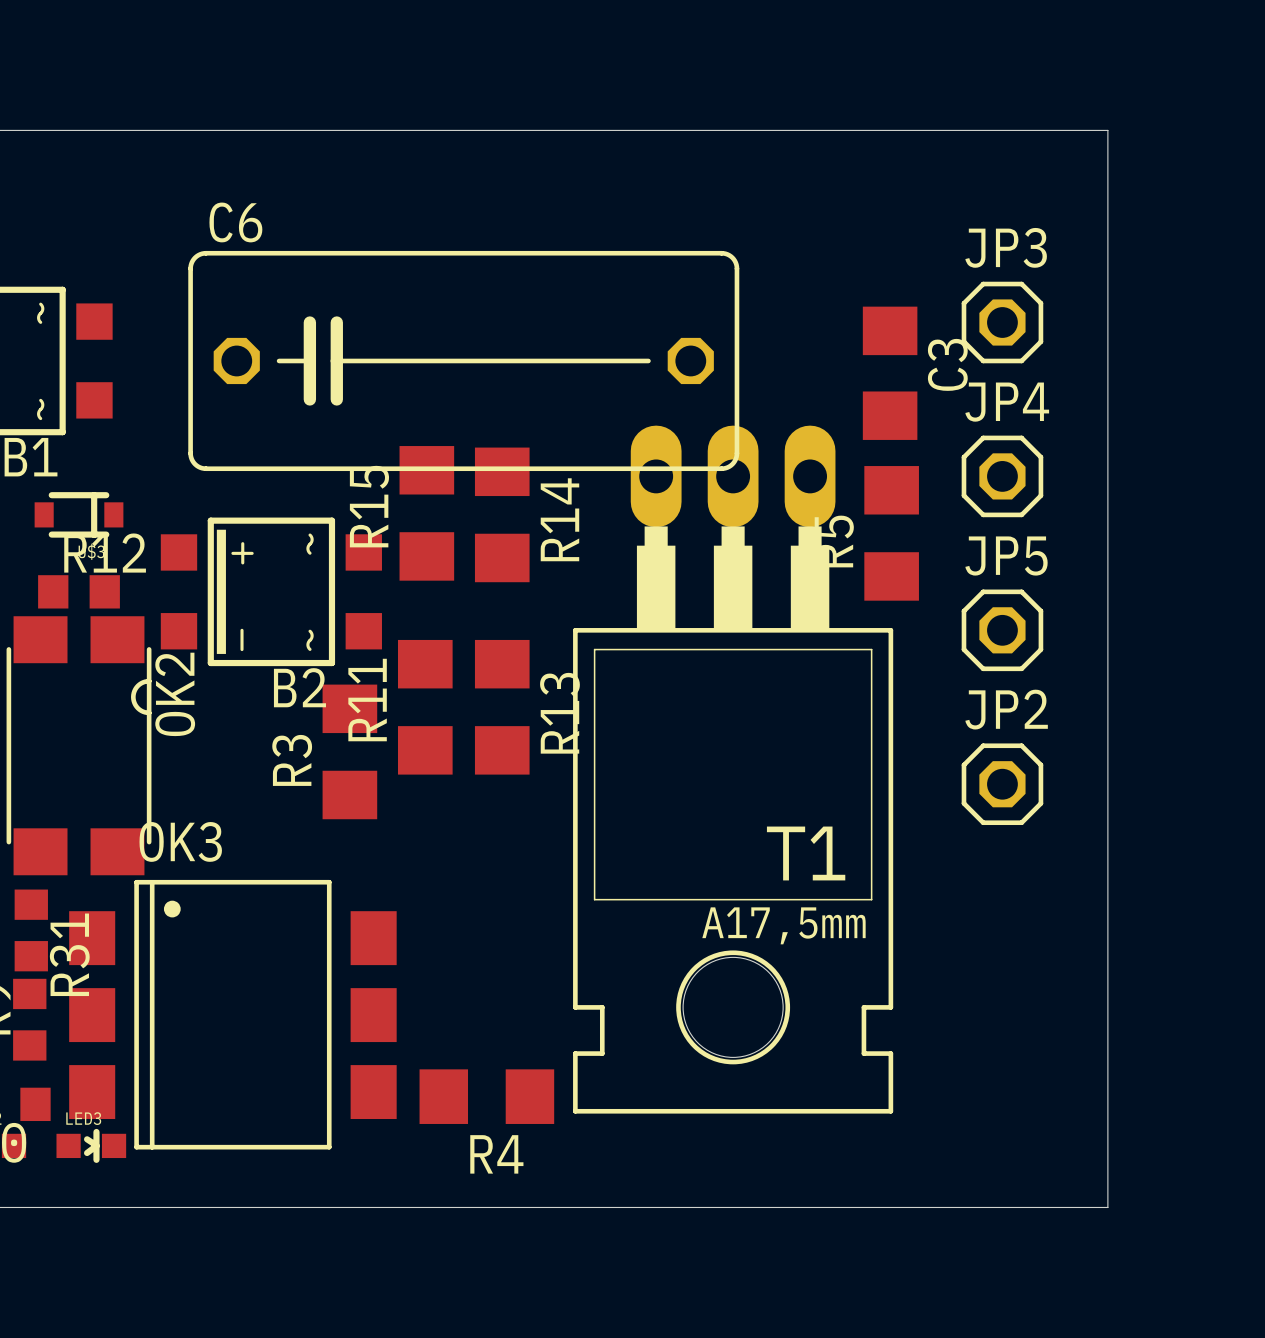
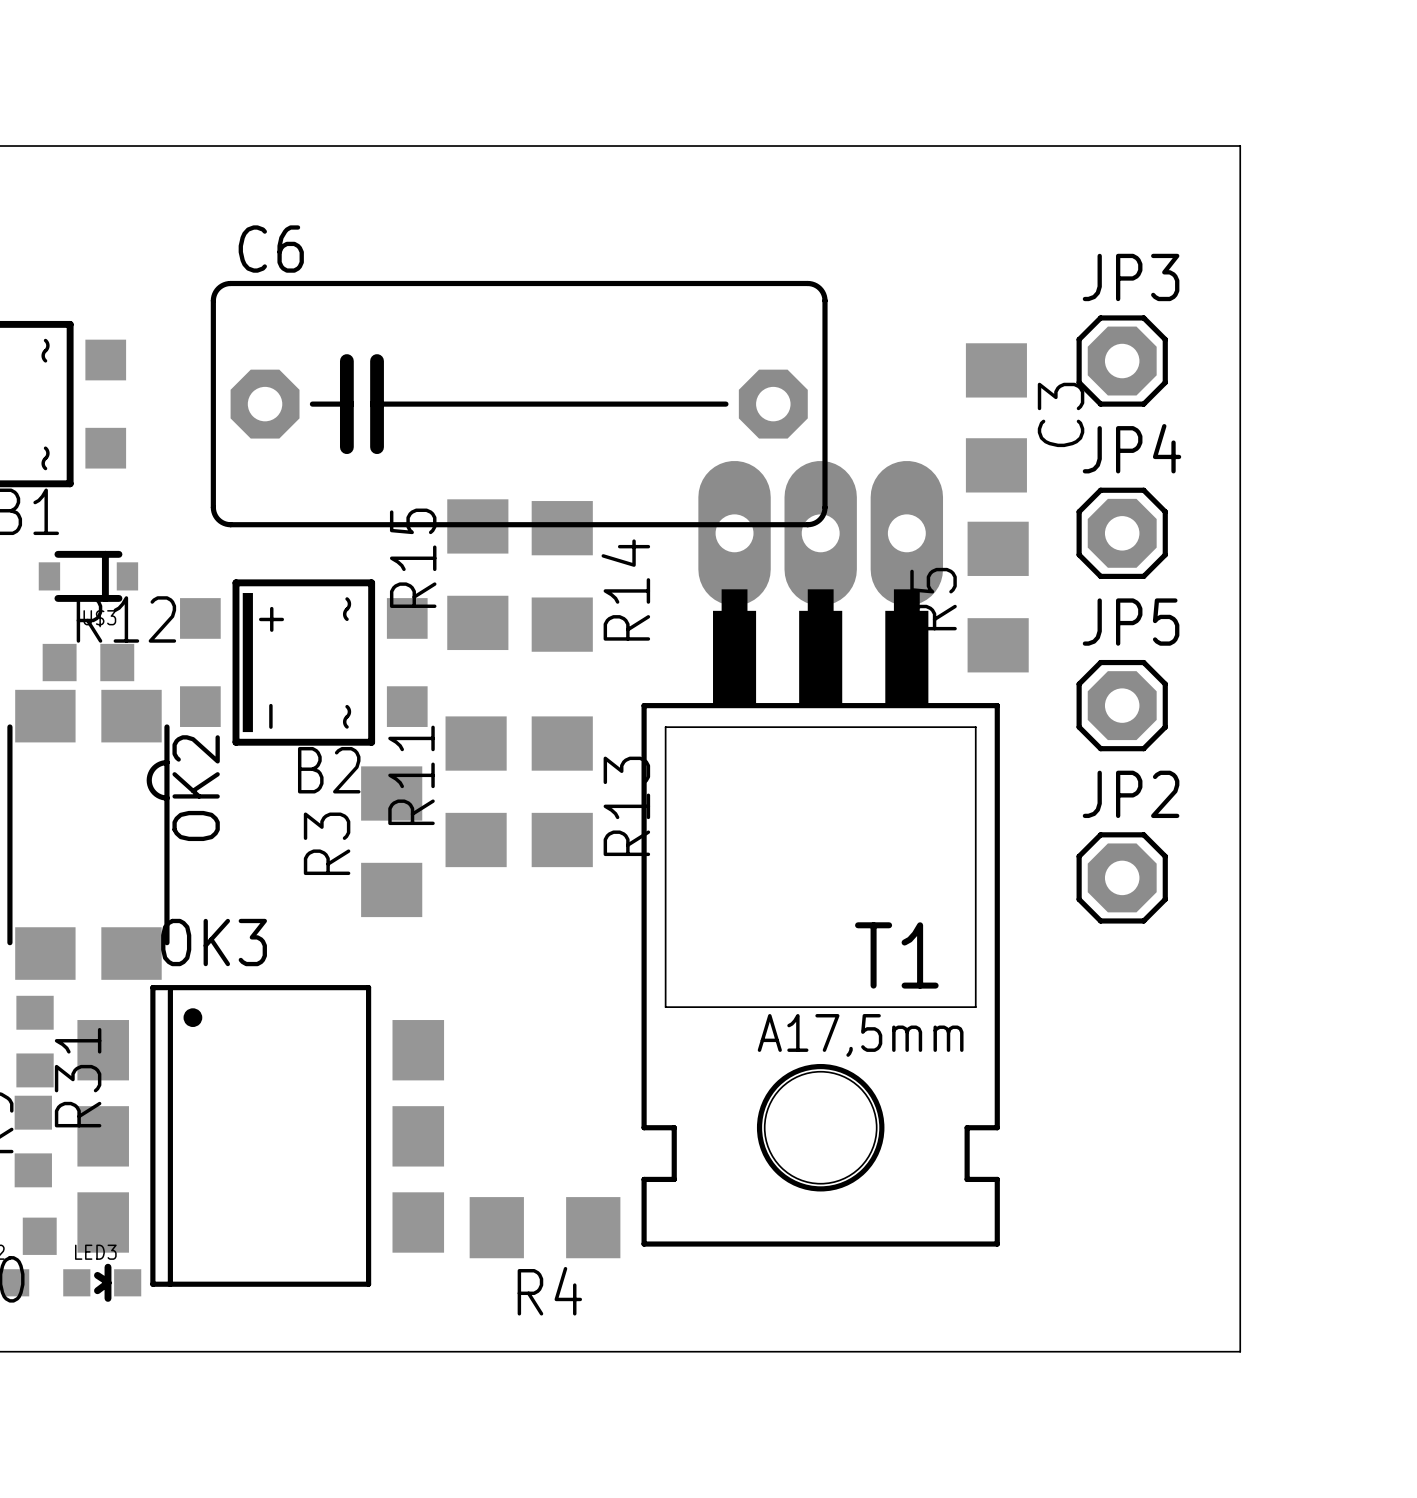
C6 footprint: [188, 250, 740, 472] -> [210, 280, 828, 528]
JP3 footprint: [961, 281, 1044, 364] -> [1076, 315, 1168, 407]
T1 footprint: [573, 425, 894, 1114] -> [641, 460, 1000, 1247]
JP4 footprint: [961, 435, 1044, 518] -> [1076, 487, 1168, 579]
JP5 footprint: [961, 589, 1044, 672] -> [1076, 659, 1168, 752]
JP2 footprint: [961, 743, 1044, 826] -> [1076, 832, 1168, 924]

